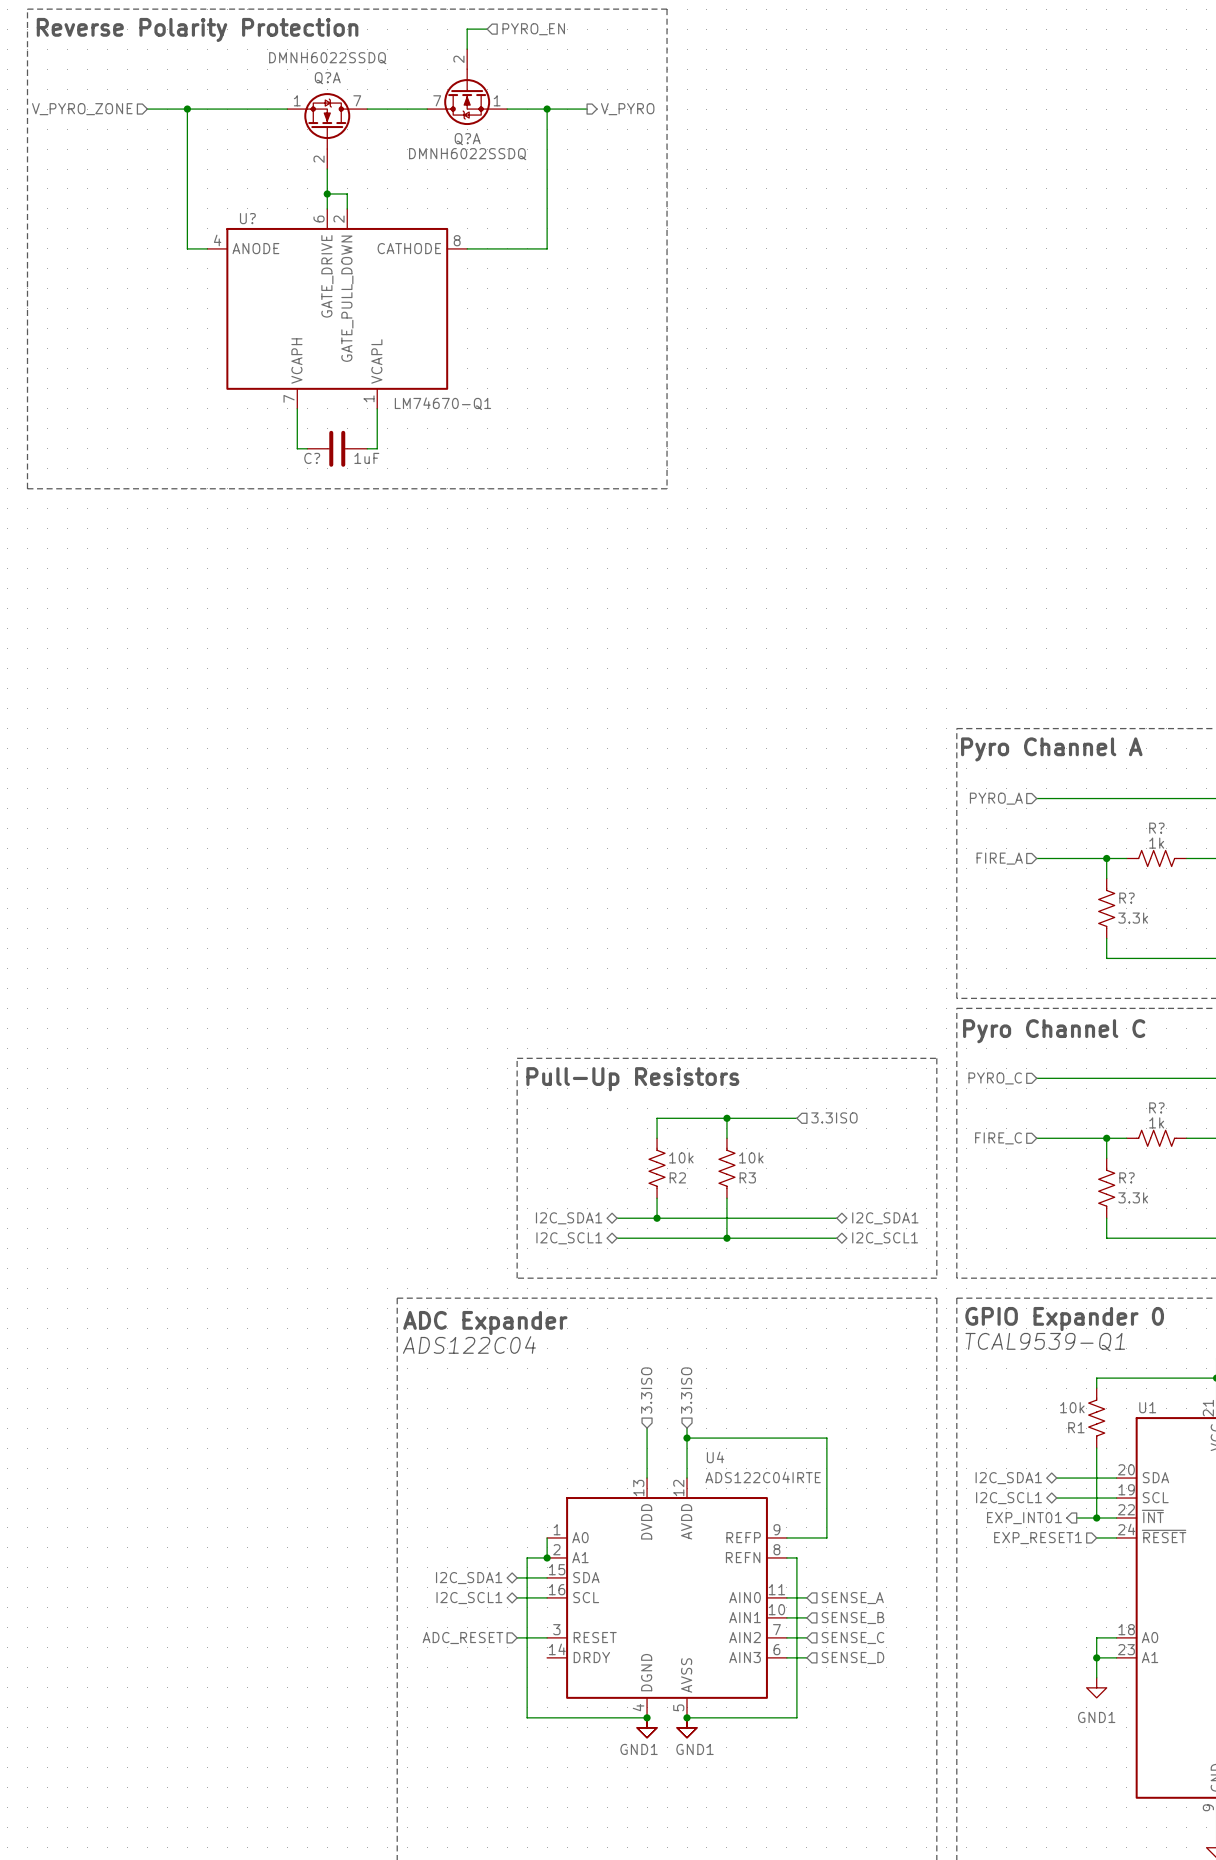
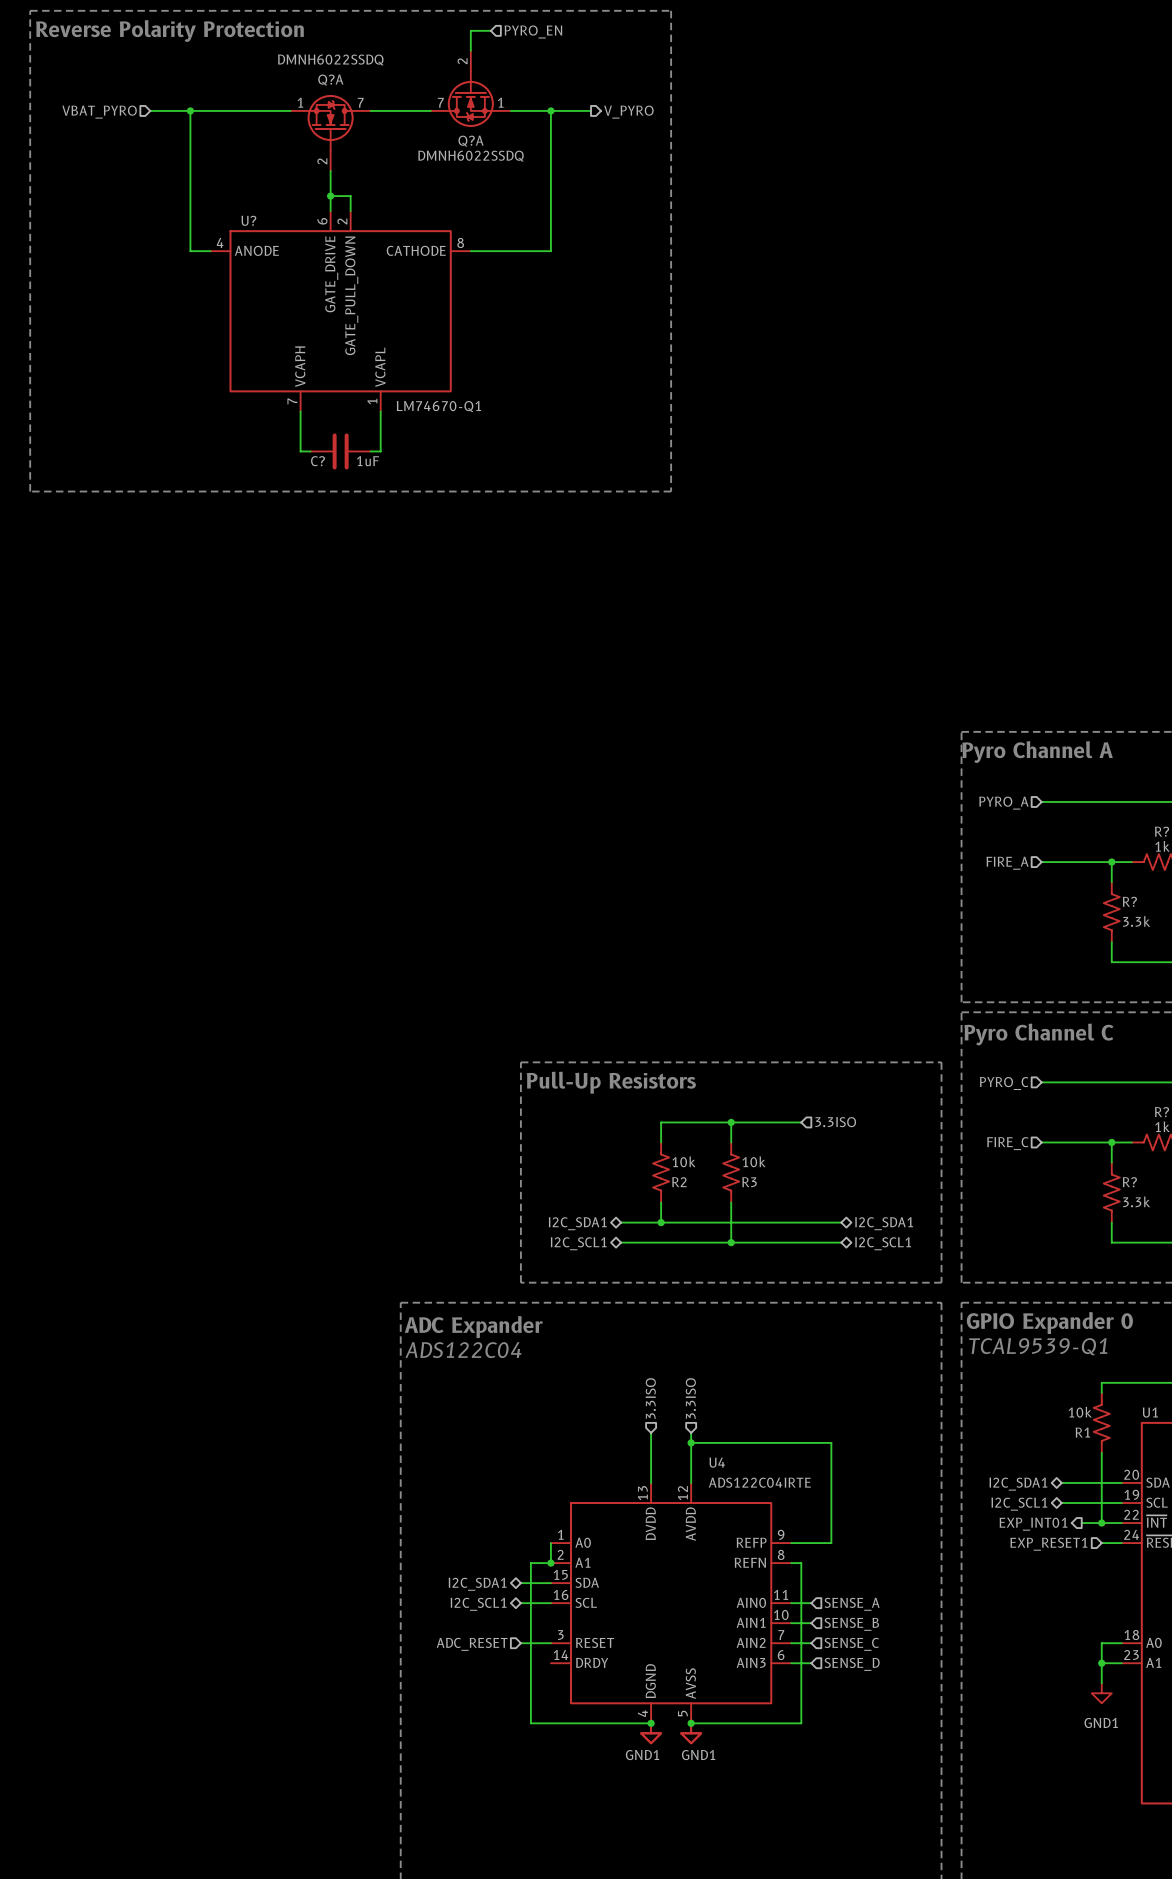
hierarchical label: V_PYRO_ZONE (82, 109) -> VBAT_PYRO (99, 112)

